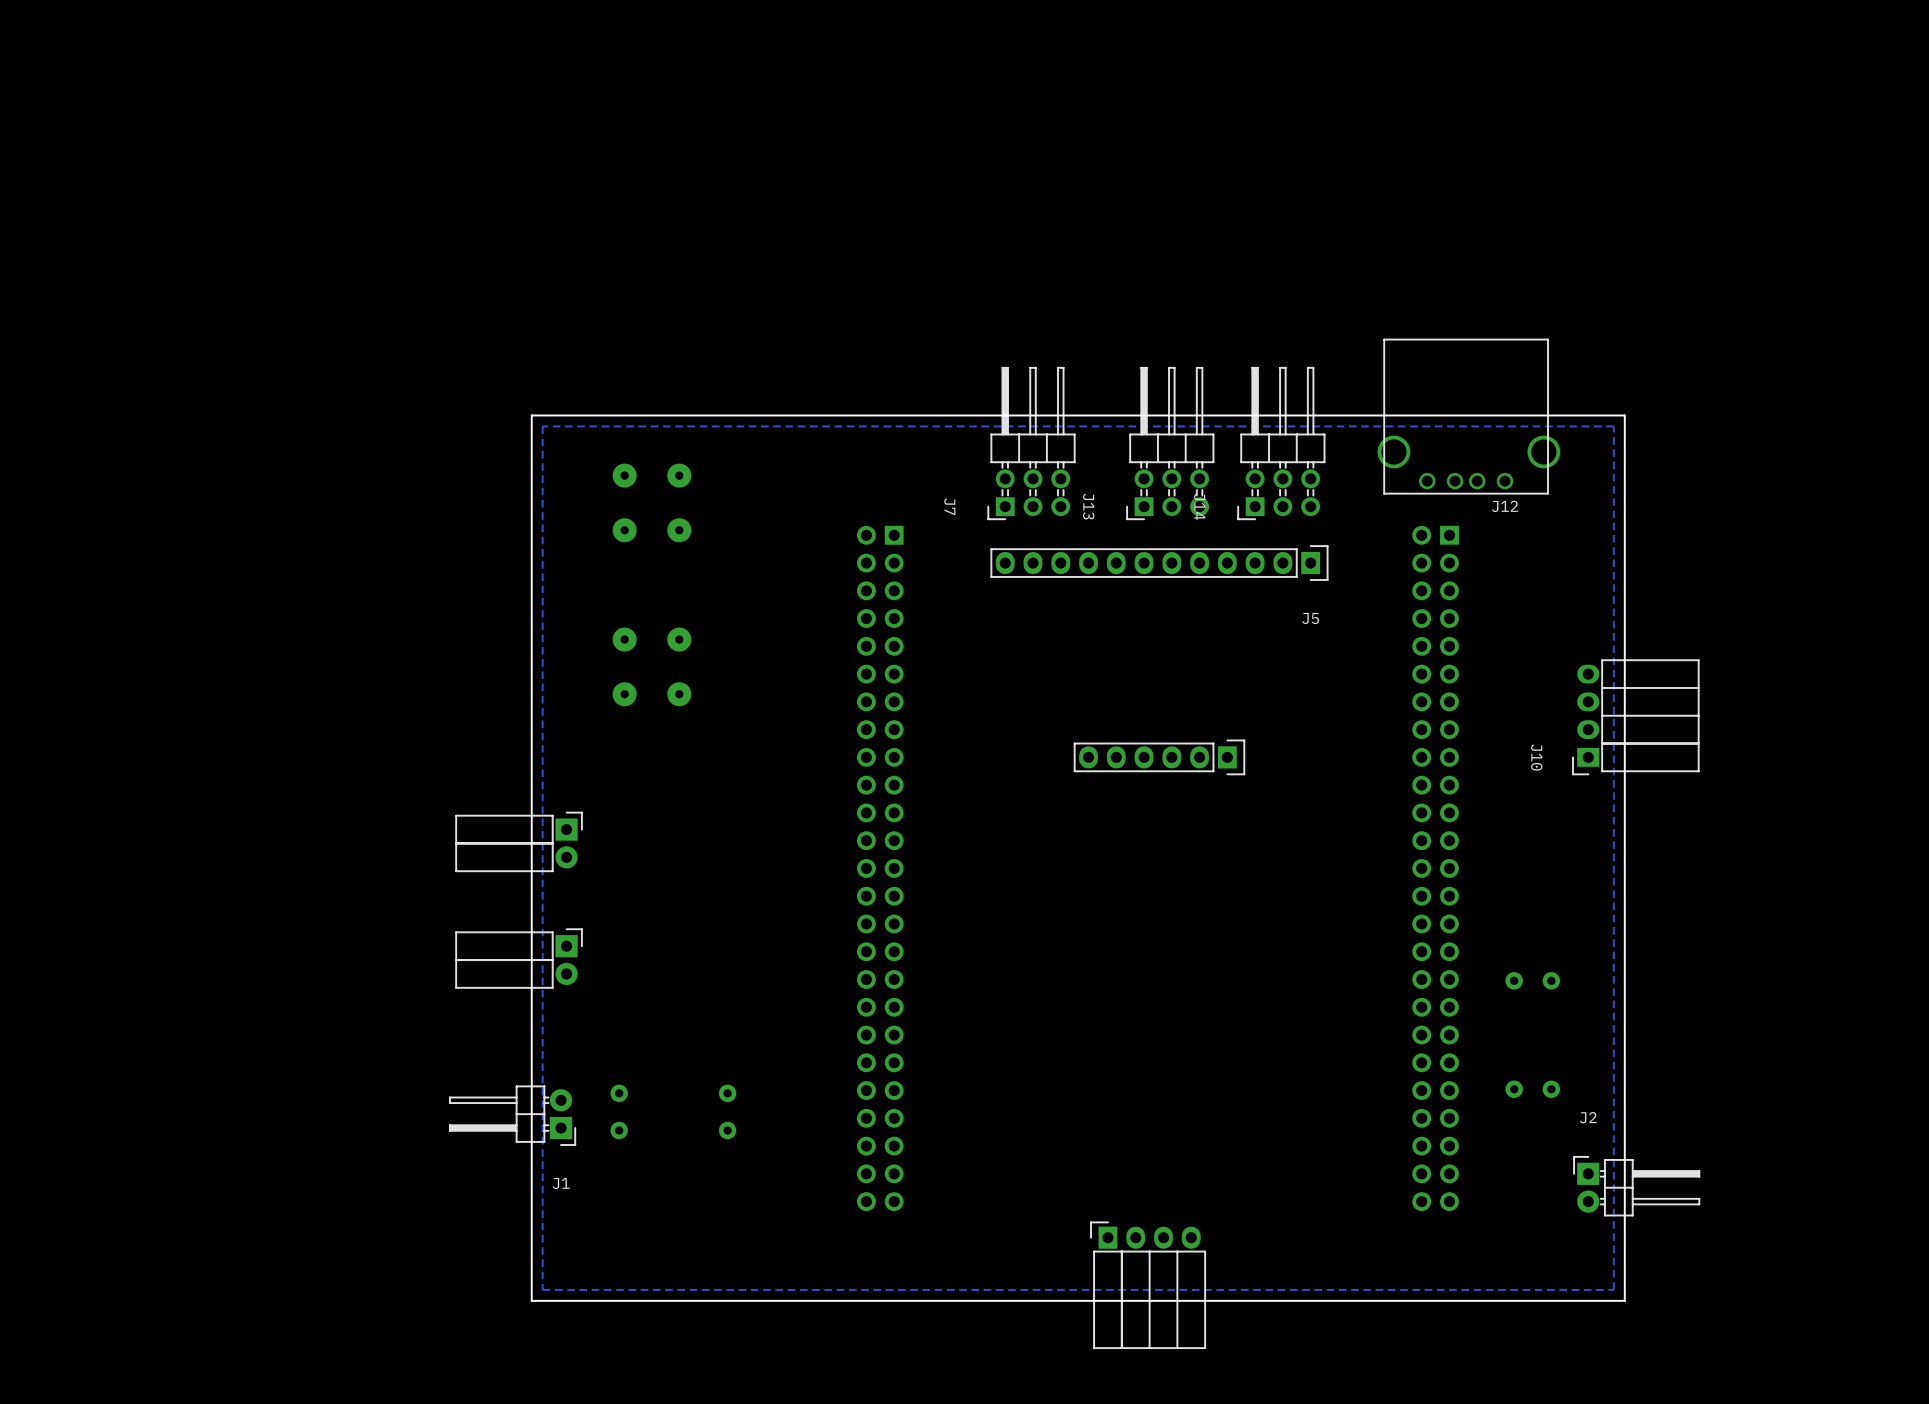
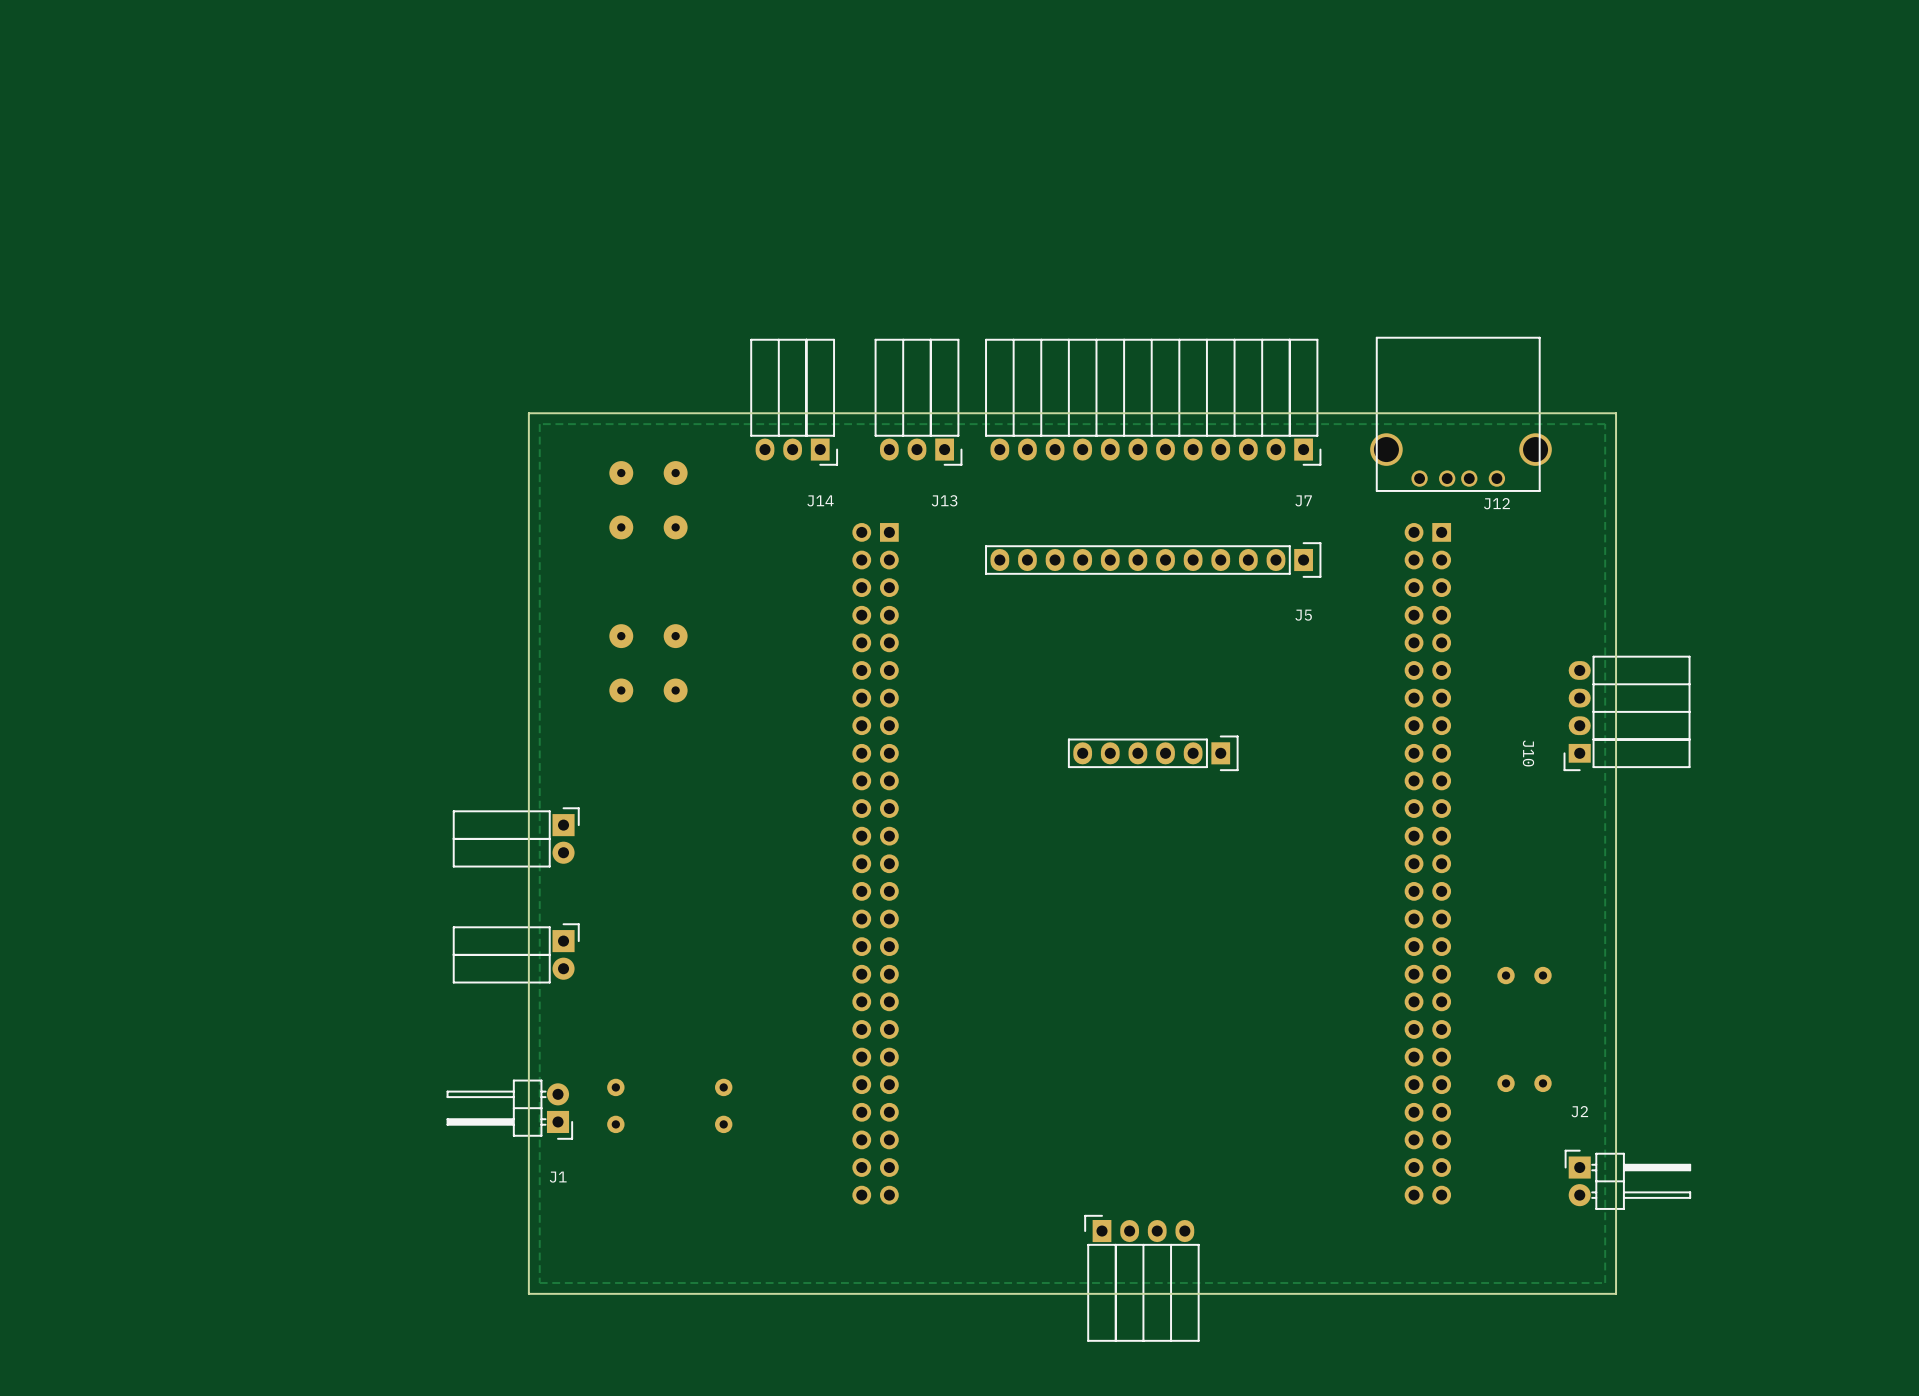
J7 footprint: [987, 367, 1076, 521] -> [985, 338, 1322, 466]
J13 footprint: [1126, 367, 1215, 521] -> [874, 338, 963, 466]
J14 footprint: [1237, 367, 1326, 521] -> [750, 338, 838, 466]
J7 name position: J7 (949, 506) -> J7 (1303, 500)
J13 name position: J13 (1088, 506) -> J13 (944, 500)
J14 name position: J14 (1199, 506) -> J14 (820, 500)

